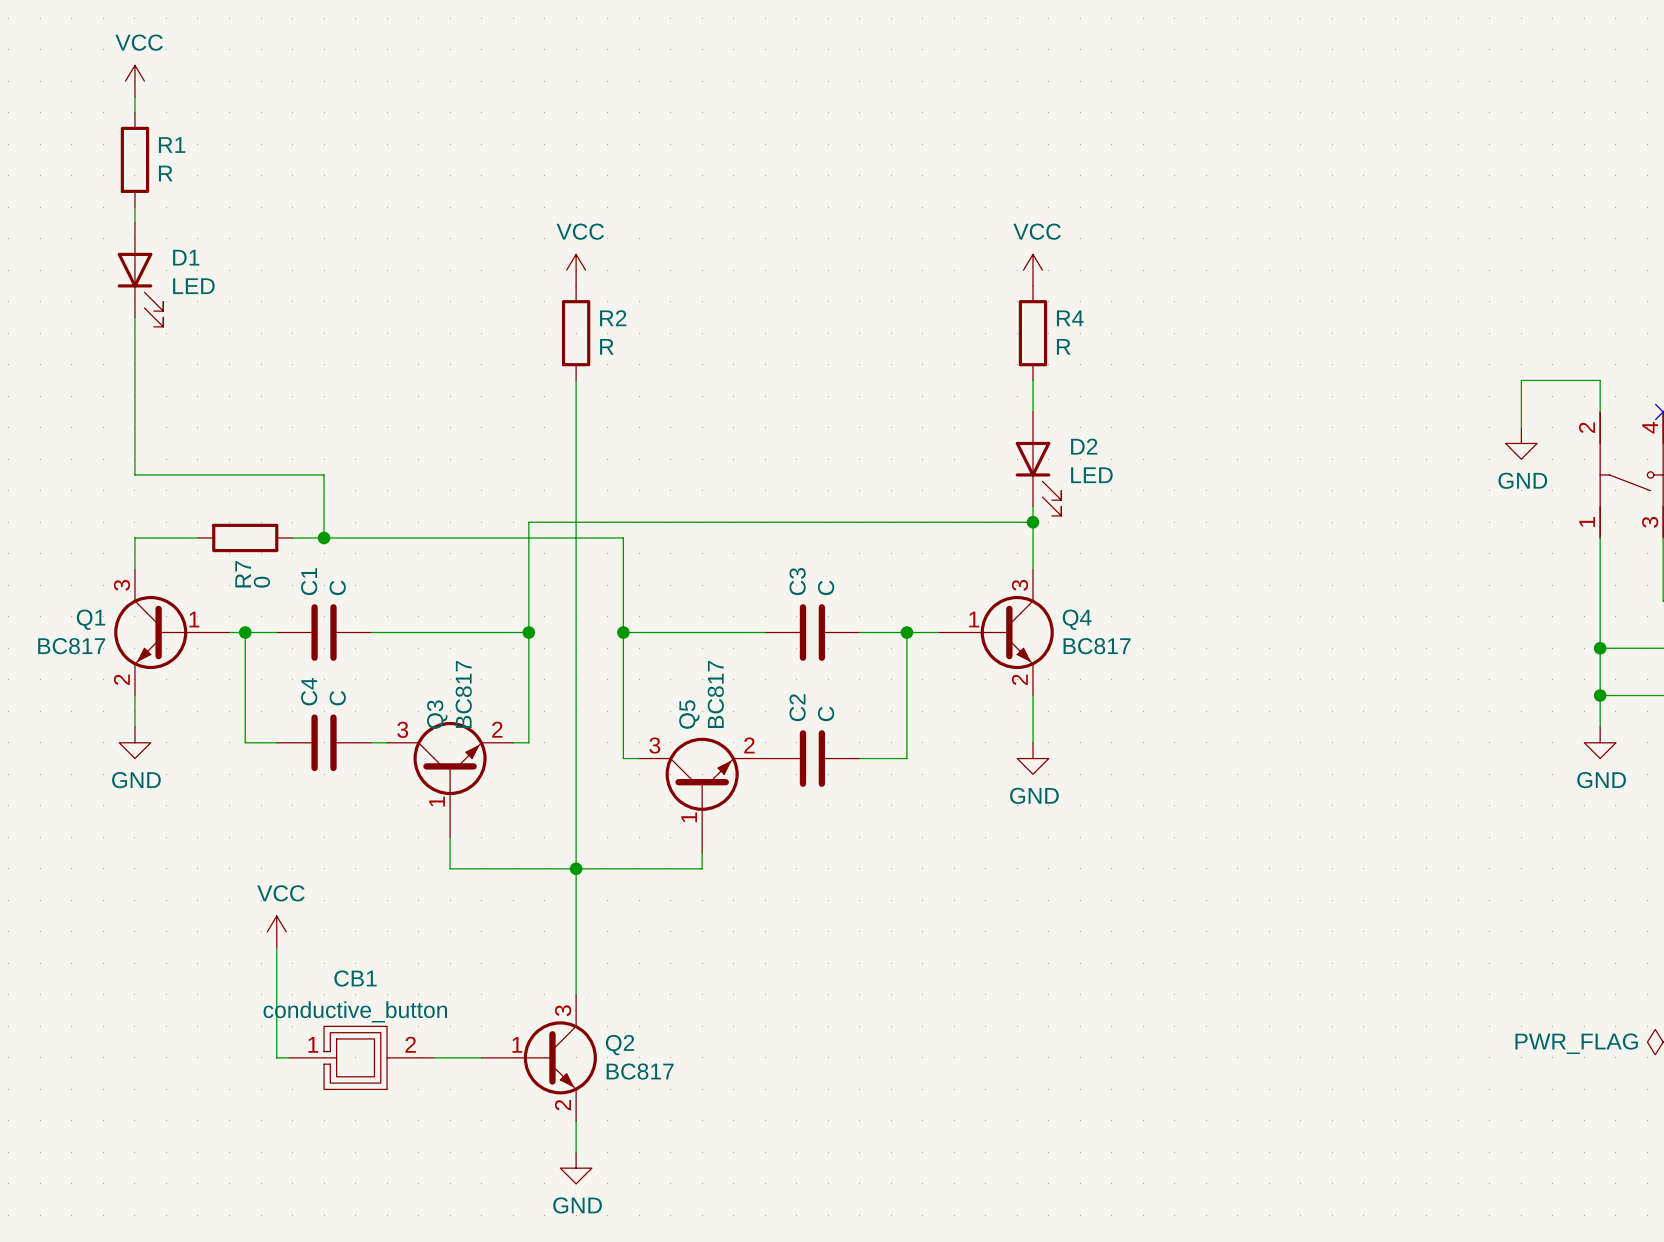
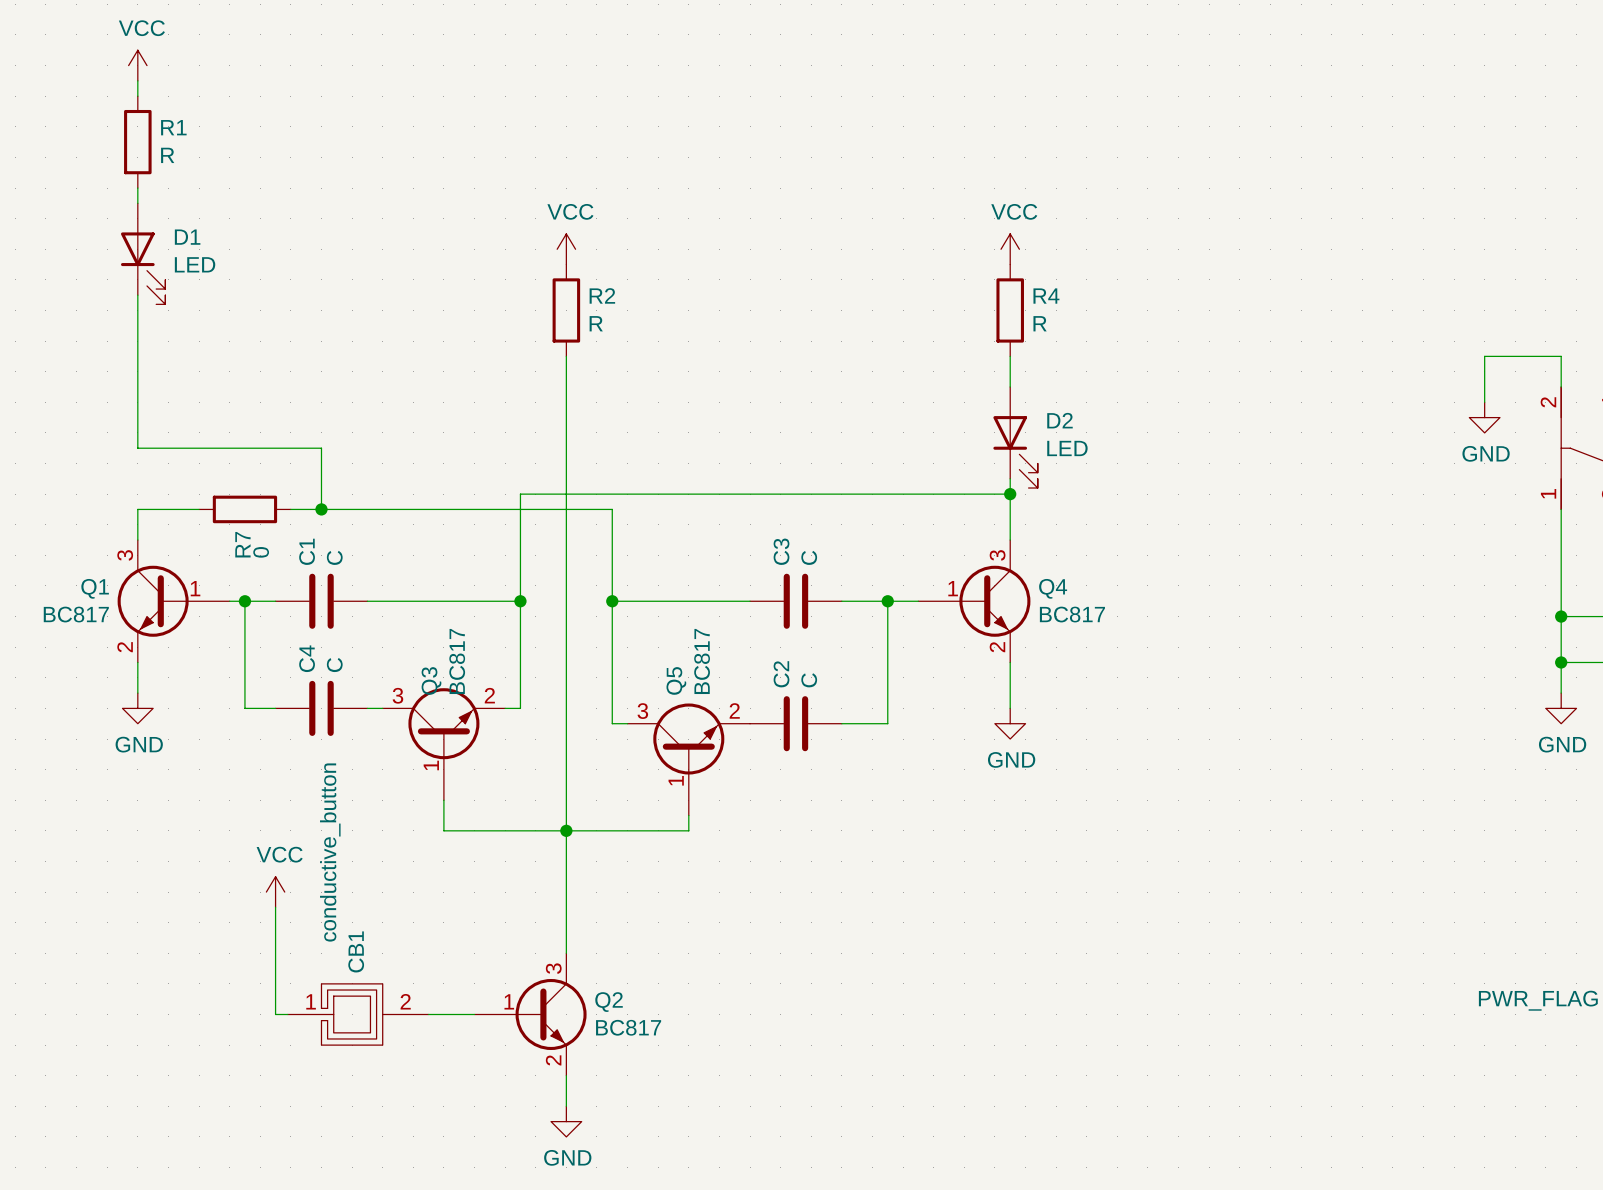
CB1 name rotation: 0° (355, 978) -> 90° counterclockwise (356, 951)
CB1 value rotation: 0° (355, 1011) -> 90° counterclockwise (330, 852)

